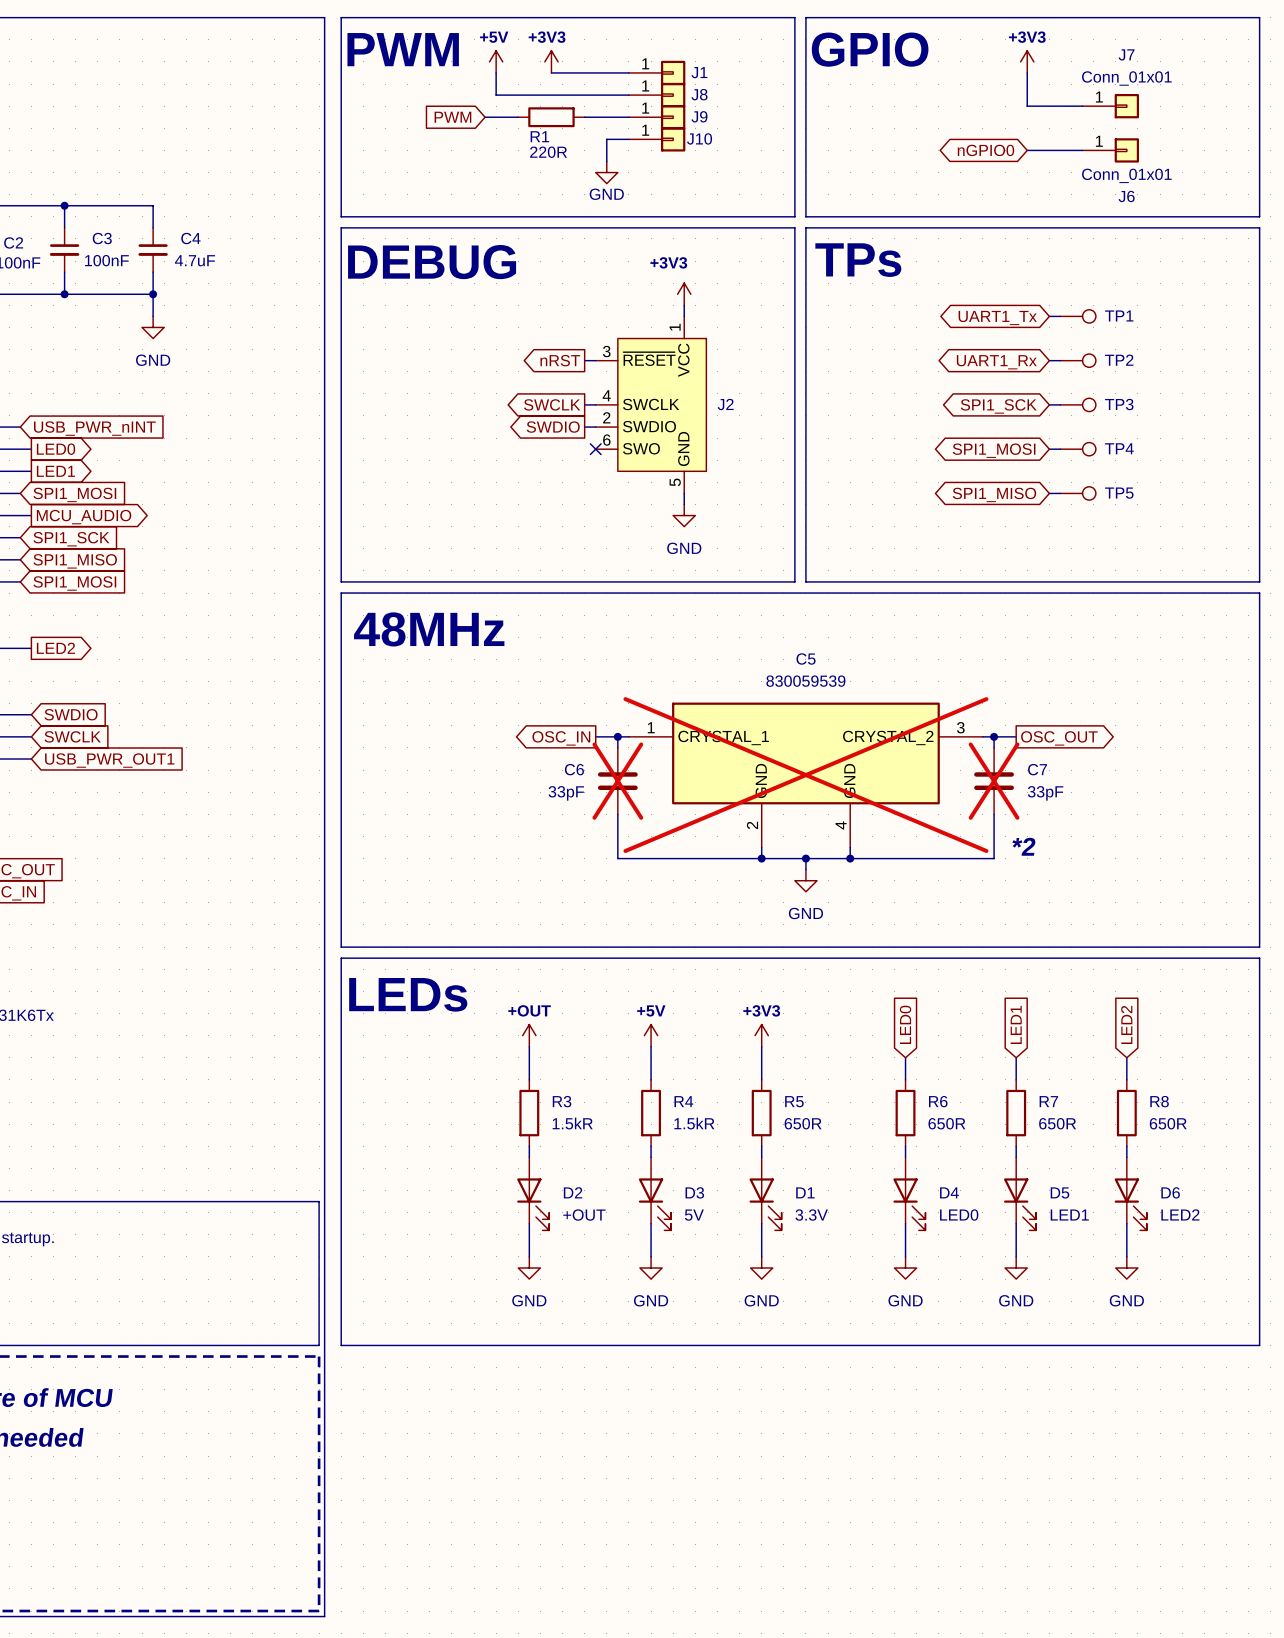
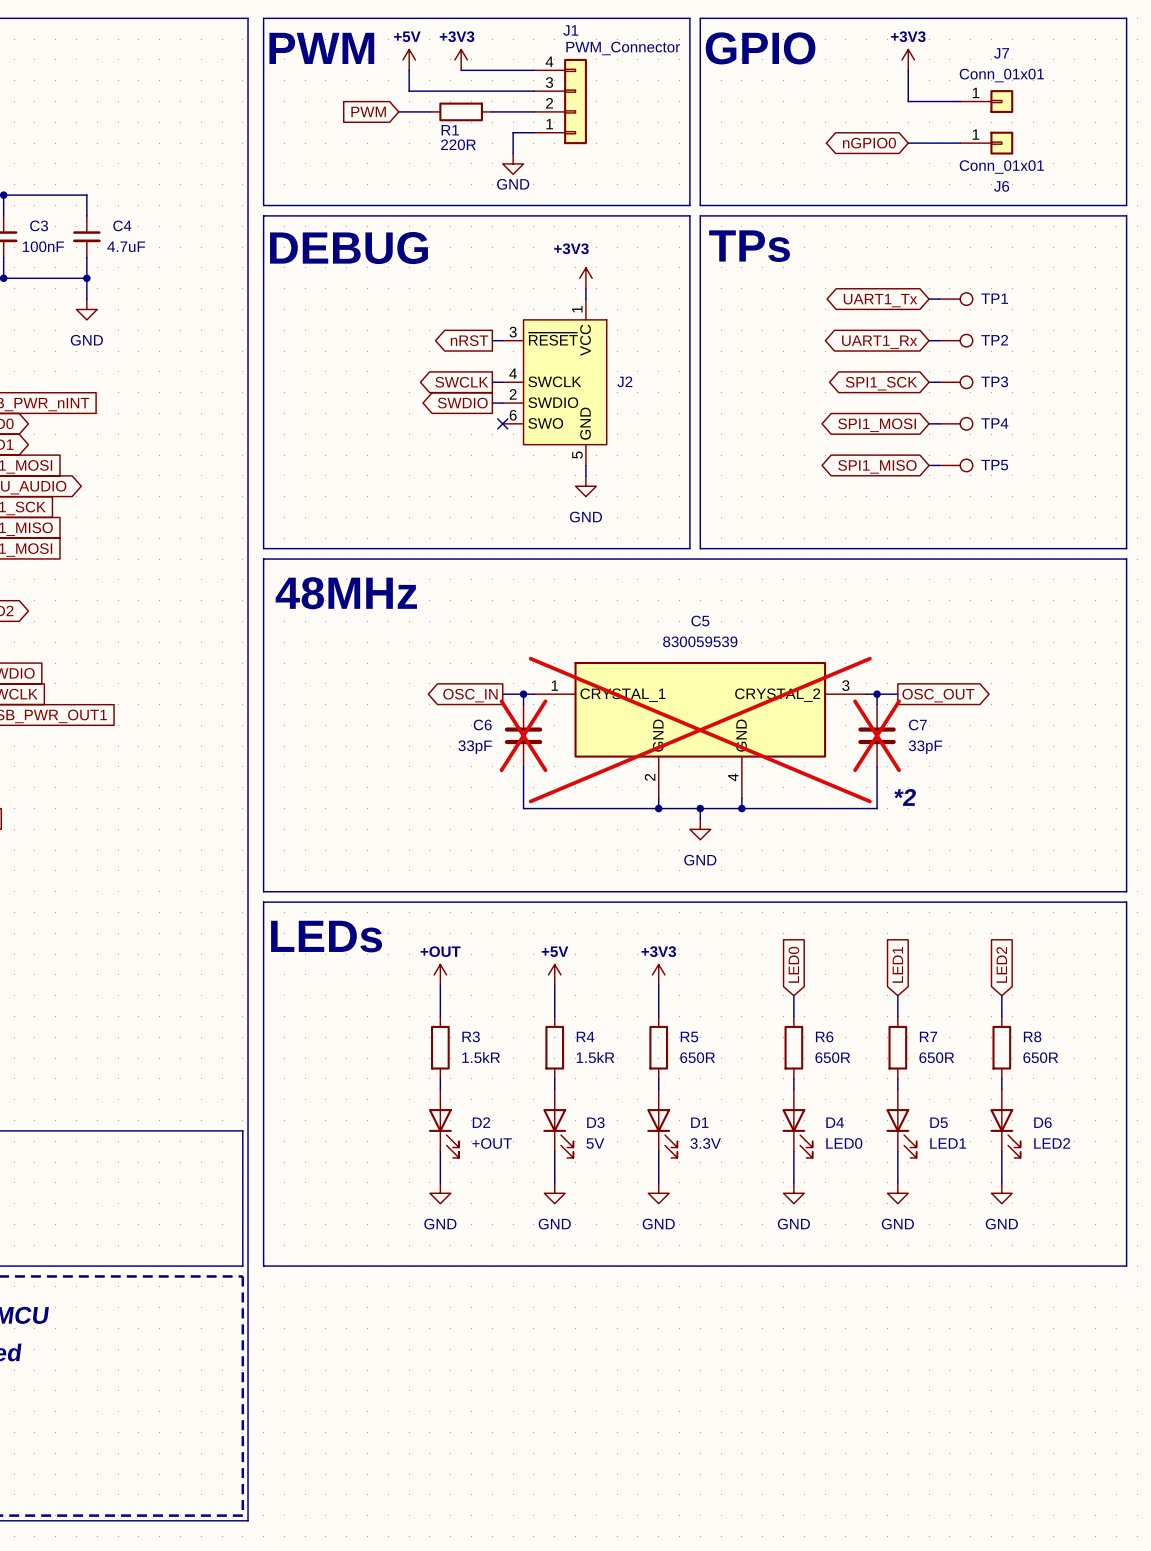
J1 value: none -> PWM_Connector (623, 48)
J1 symbol: [628, 60, 686, 86] -> [533, 58, 587, 145]
J1 name position: J1 (699, 72) -> J1 (570, 30)
J8: (657, 95) -> none
J9: (657, 117) -> none
J10: (657, 139) -> none

